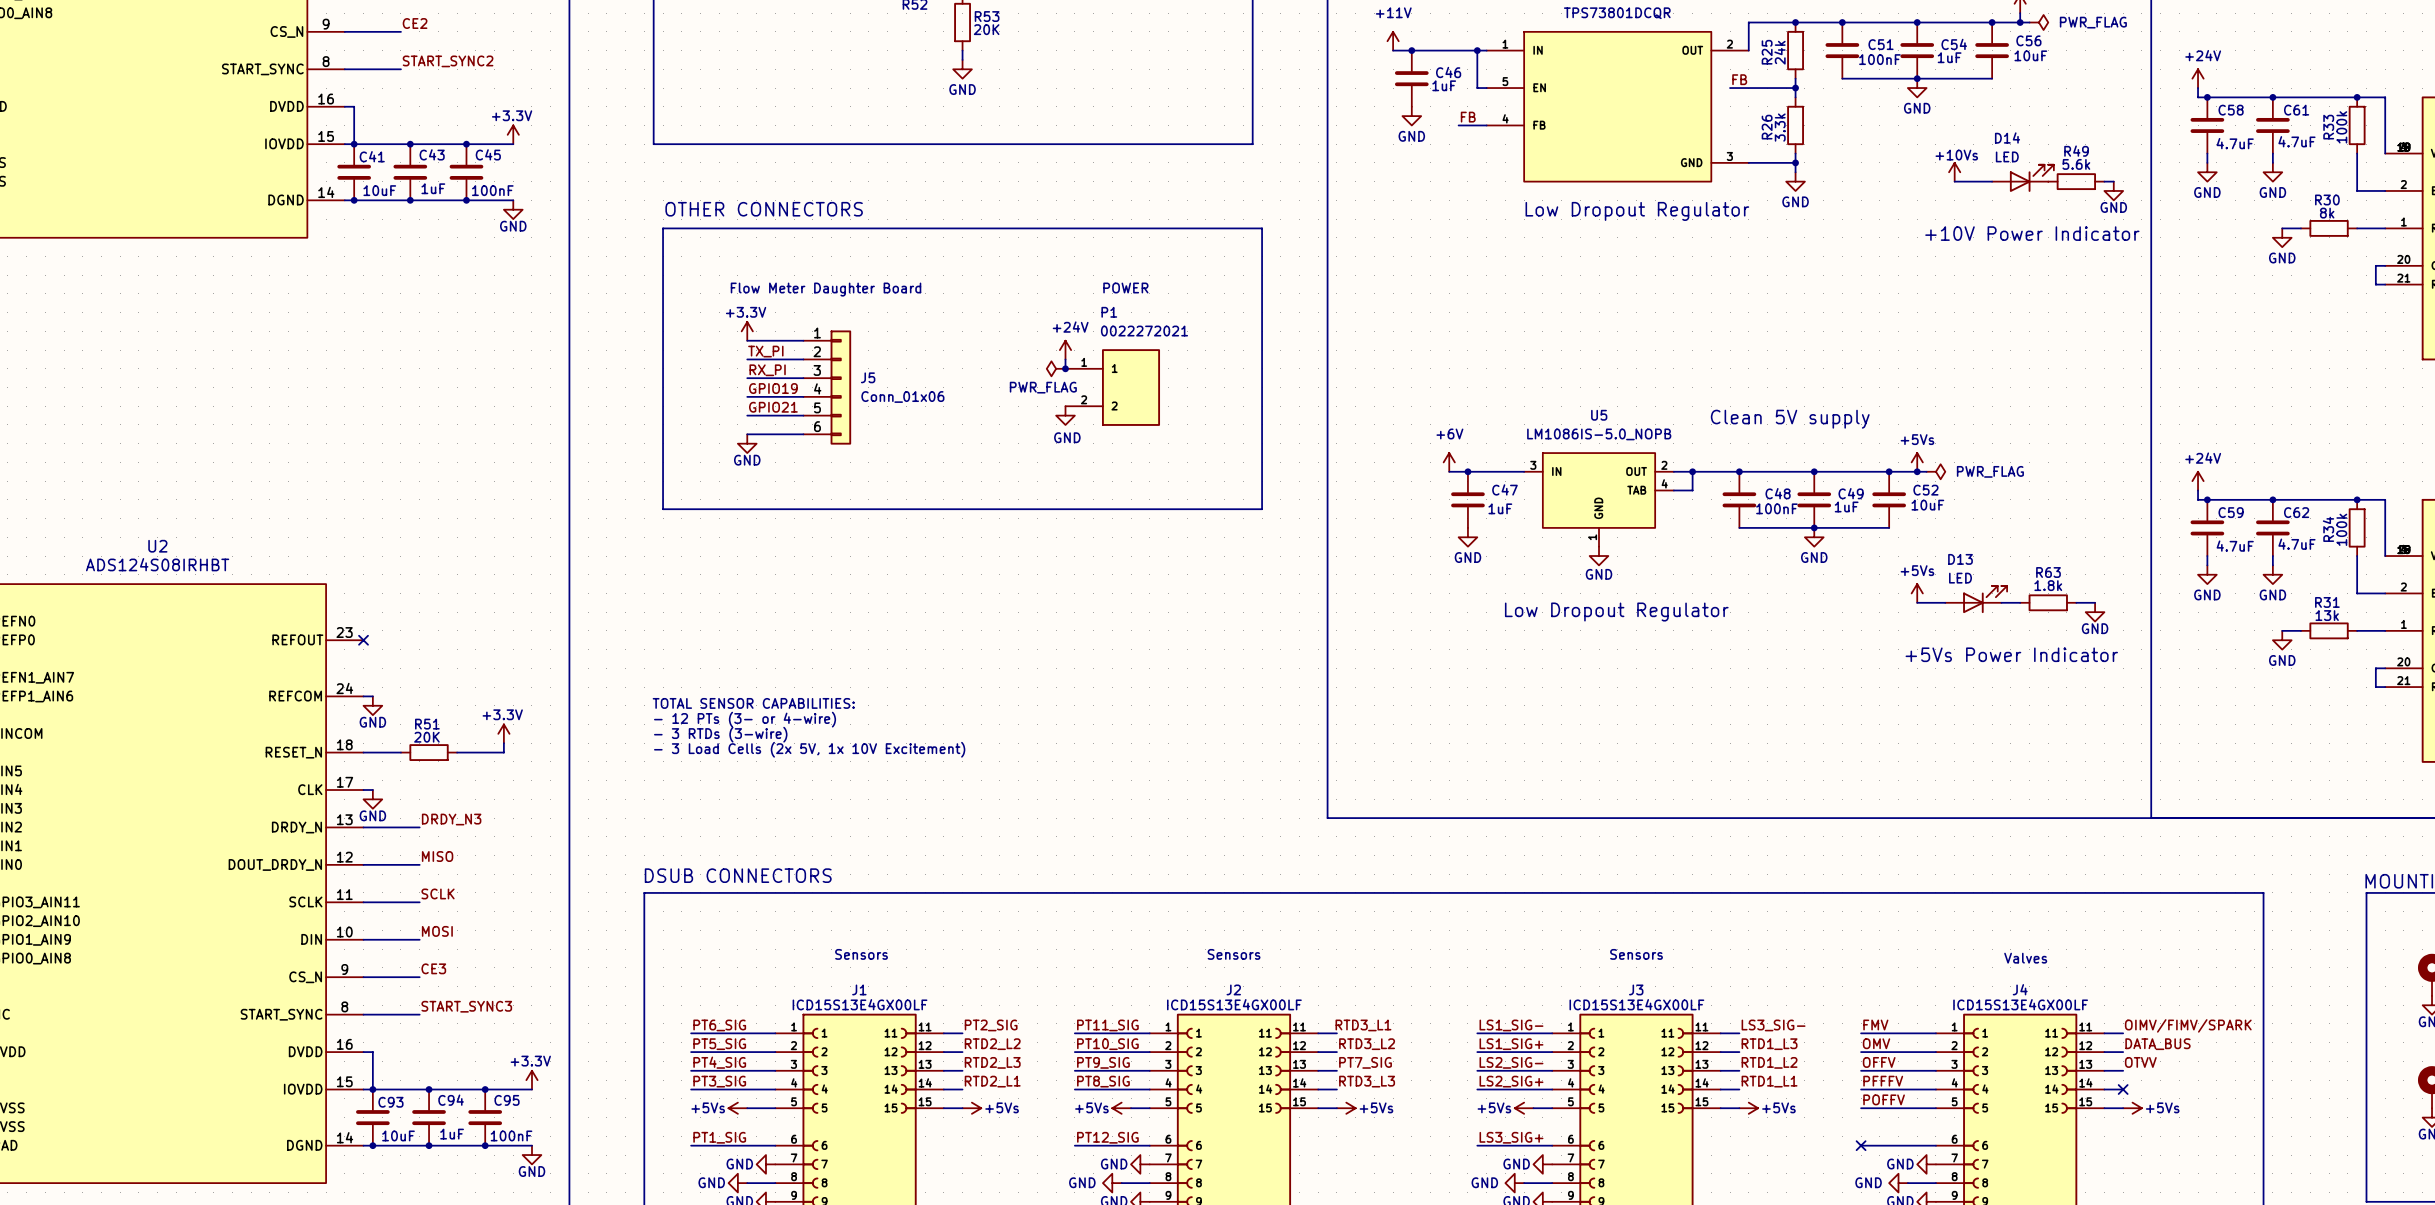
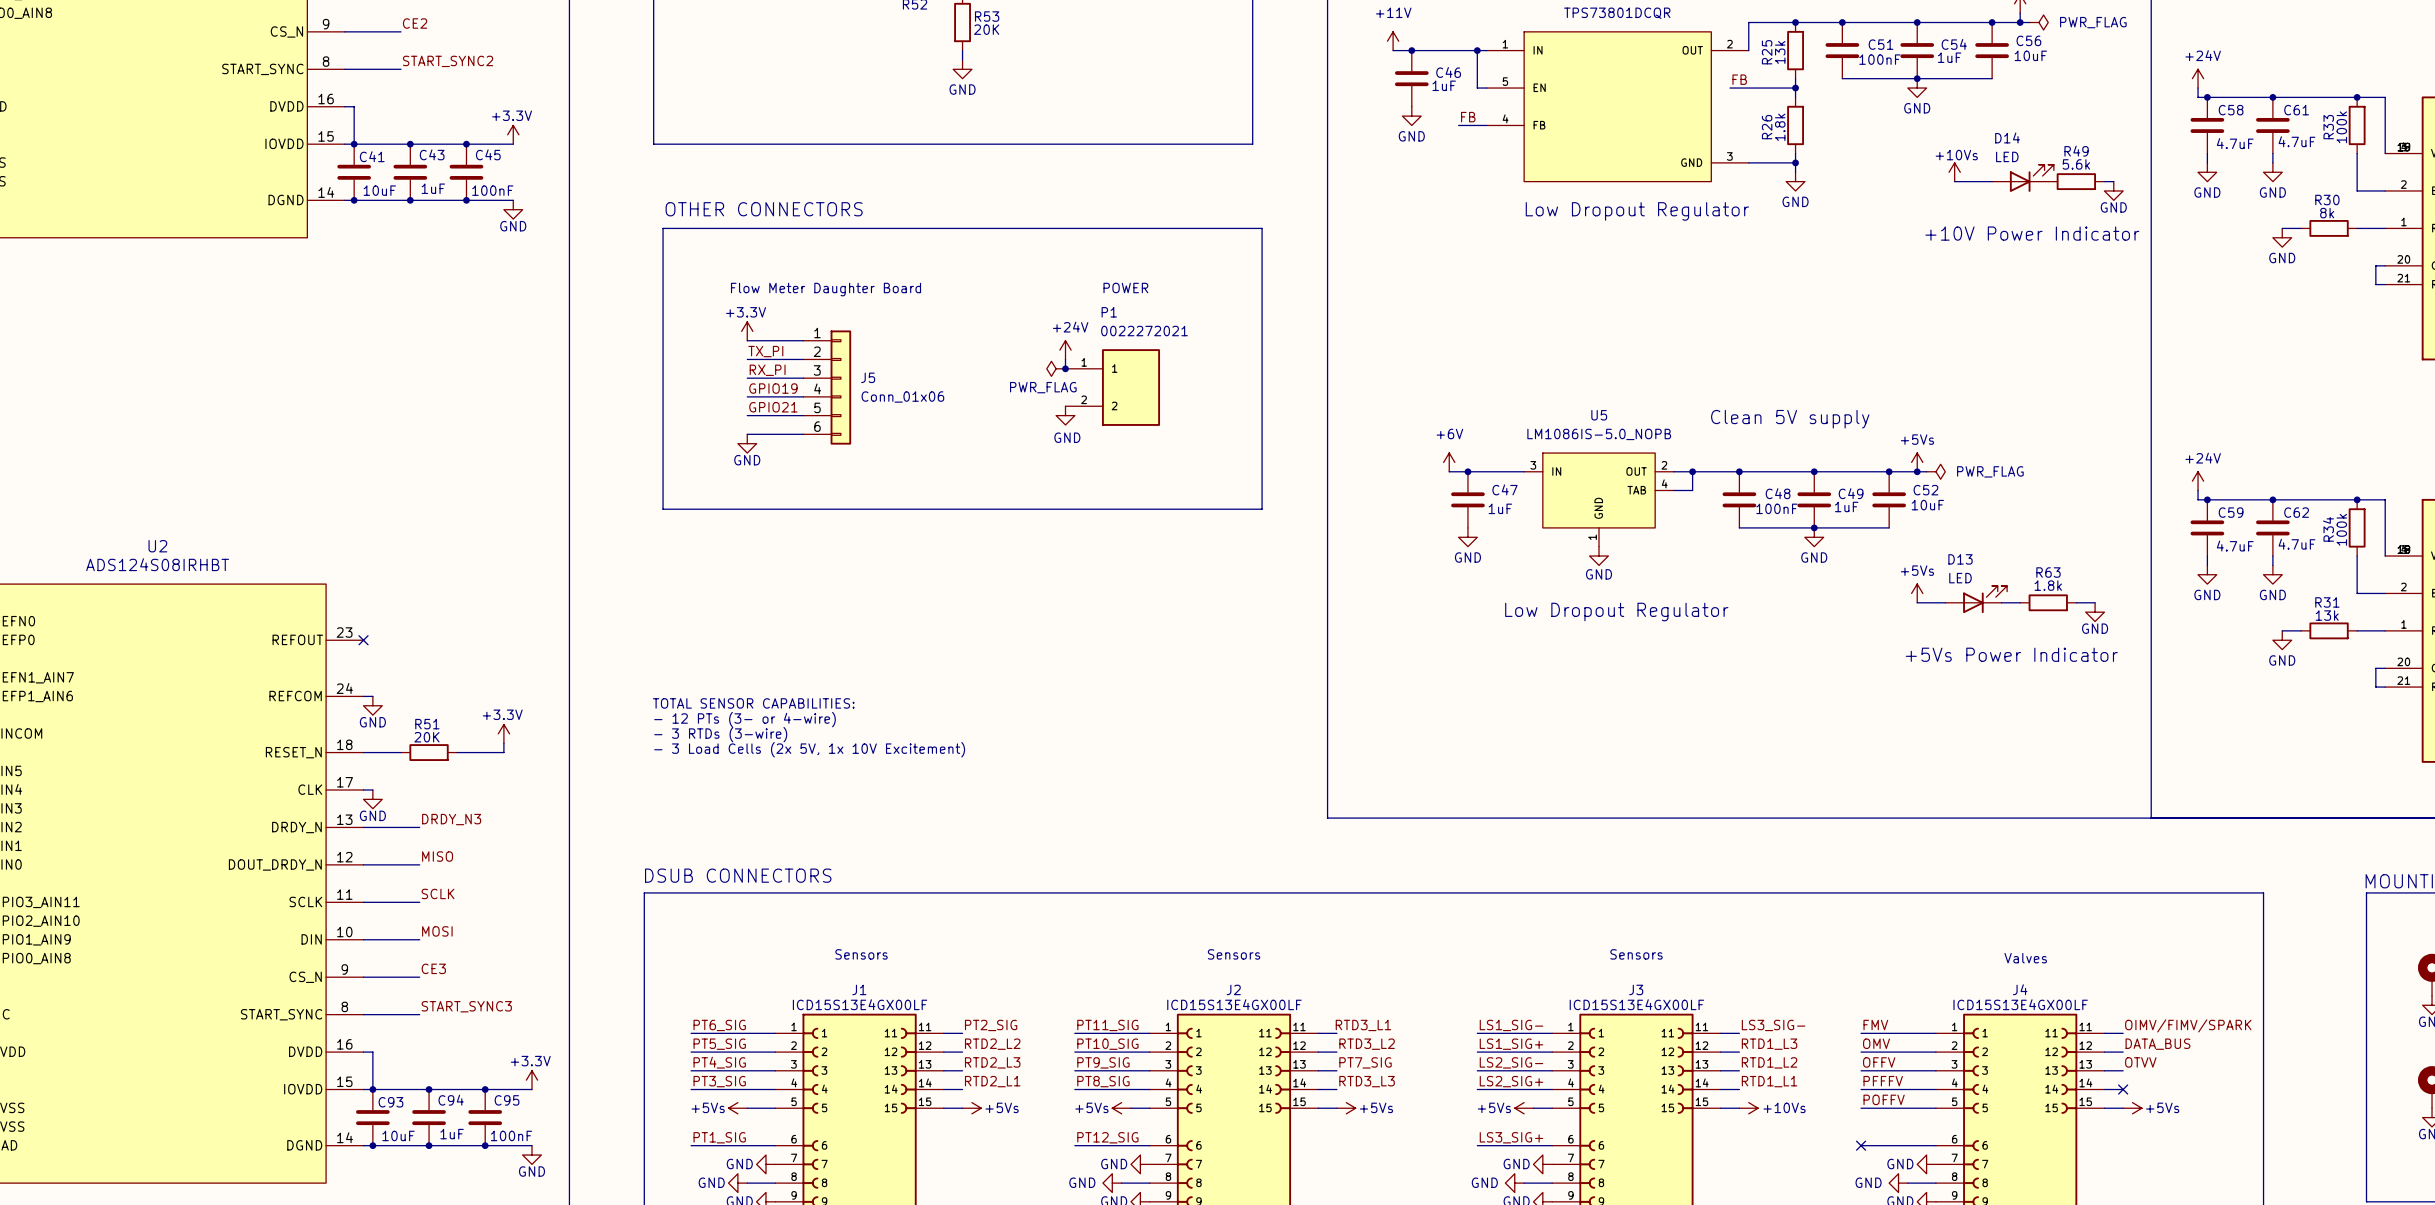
R25 value: 24k (1780, 52) -> 13k (1780, 52)
R26 value: 3.3k (1780, 127) -> 1.8k (1780, 127)
power symbol: +5Vs (1748, 1108) -> +10Vs (1748, 1108)

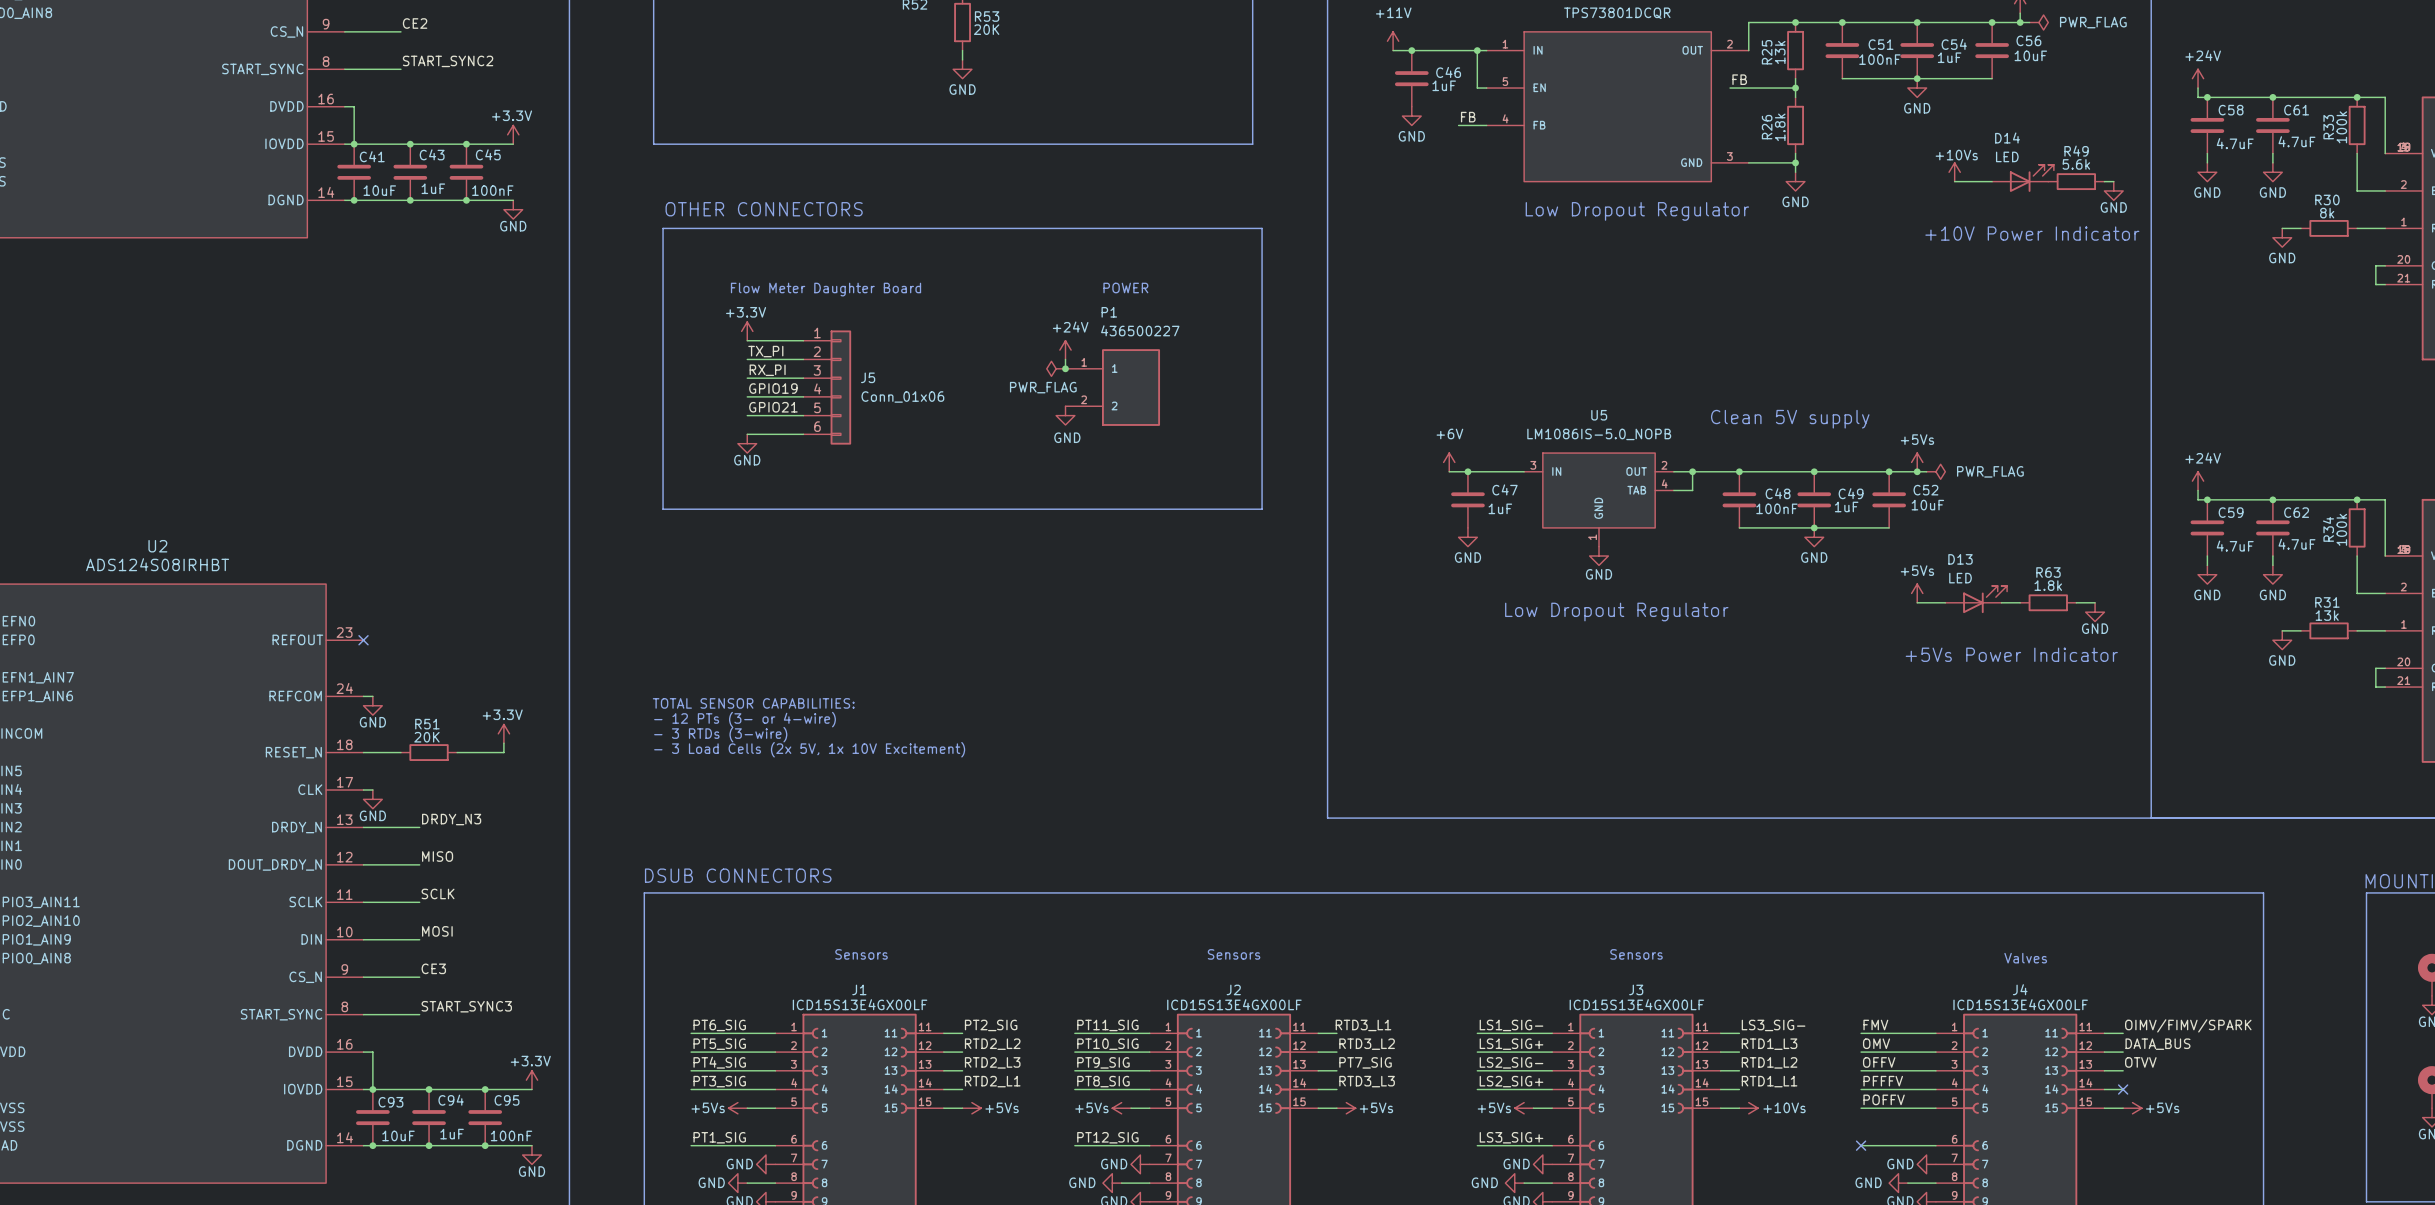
P1 value: 0022272021 (1144, 331) -> 436500227 (1140, 330)

